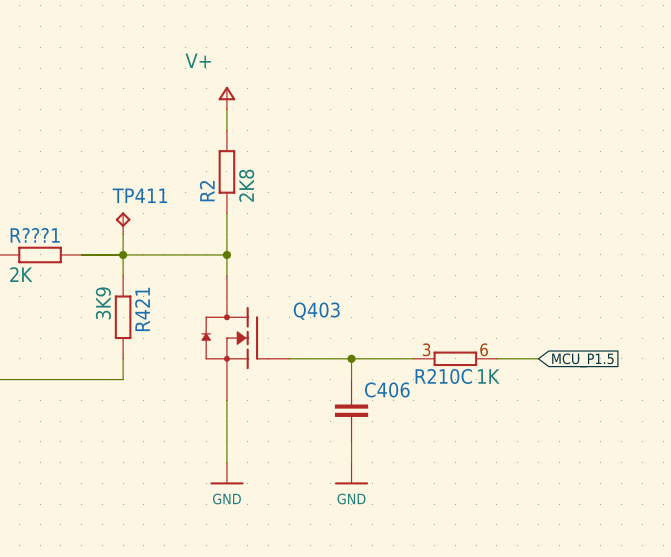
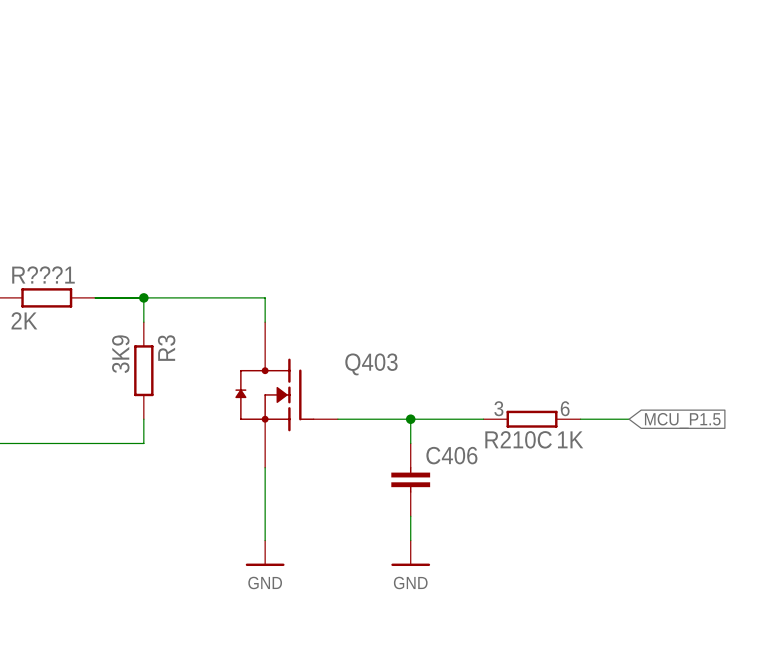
power symbol: V+ (226, 98) -> none
wire: (226, 109) (226, 130) -> none
R2: 2K8 (226, 171) -> none
wire: (226, 213) (226, 254) -> none
TP411: (123, 223) -> none
wire: (123, 234) (123, 254) -> none
junction: (226, 254) -> none
R421 name: R421 (142, 309) -> R3 (166, 348)

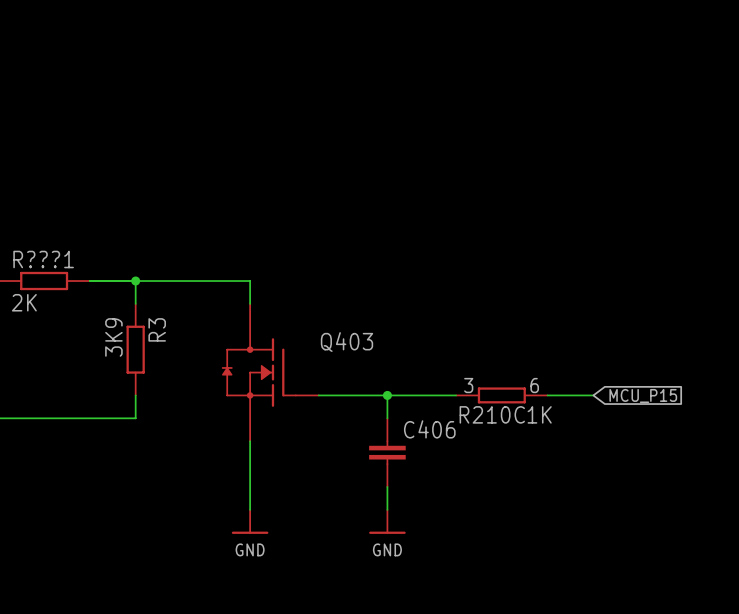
global label: MCU_P1.5 (682, 420) -> MCU_P15 (643, 395)

